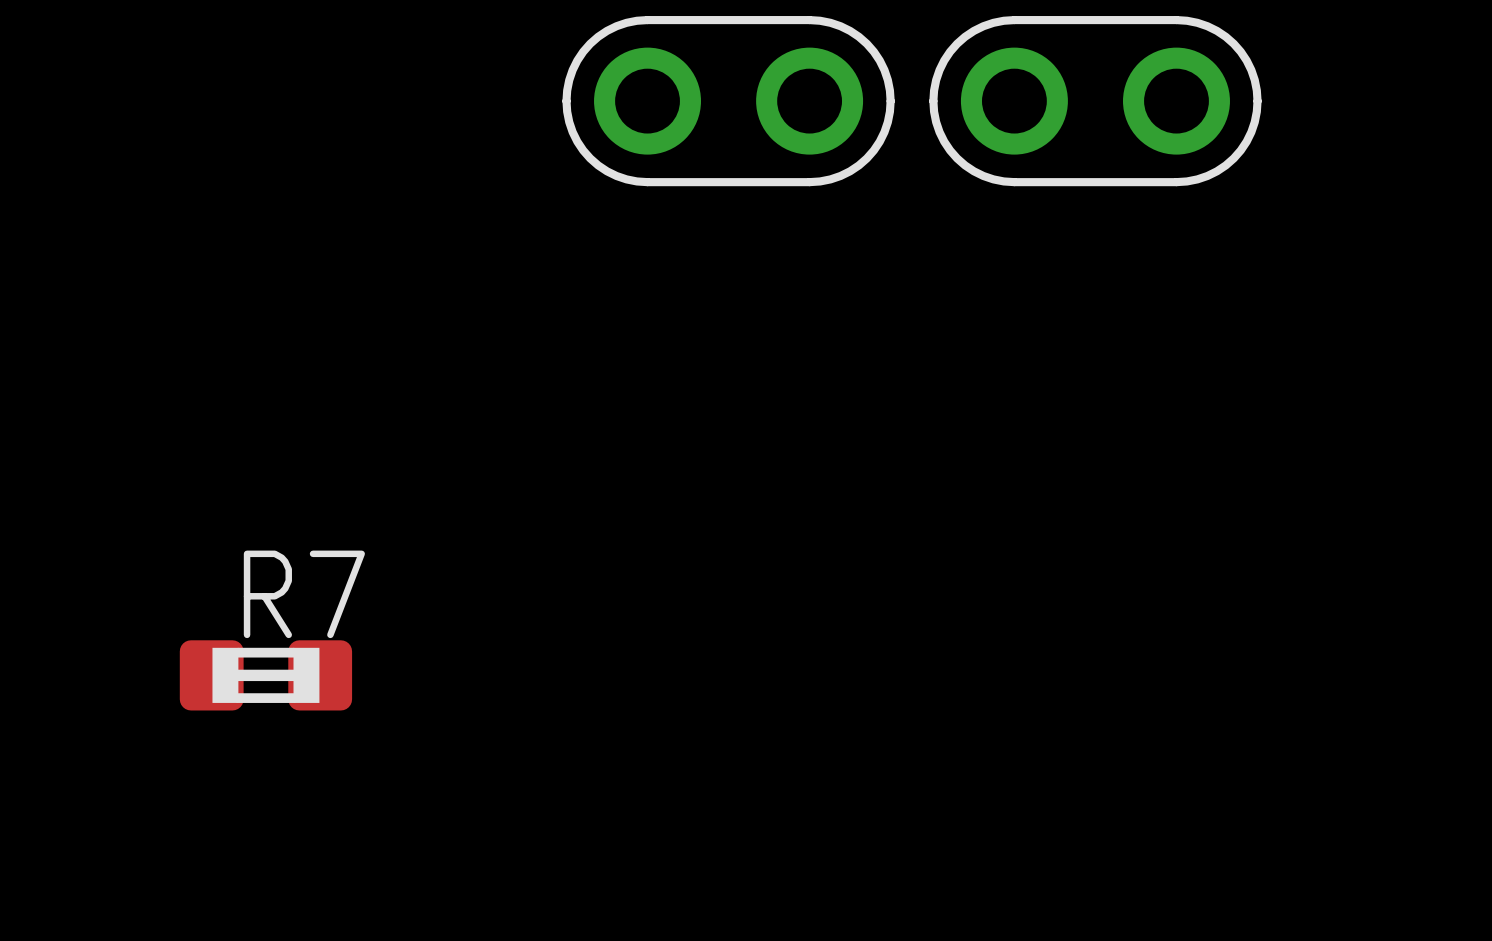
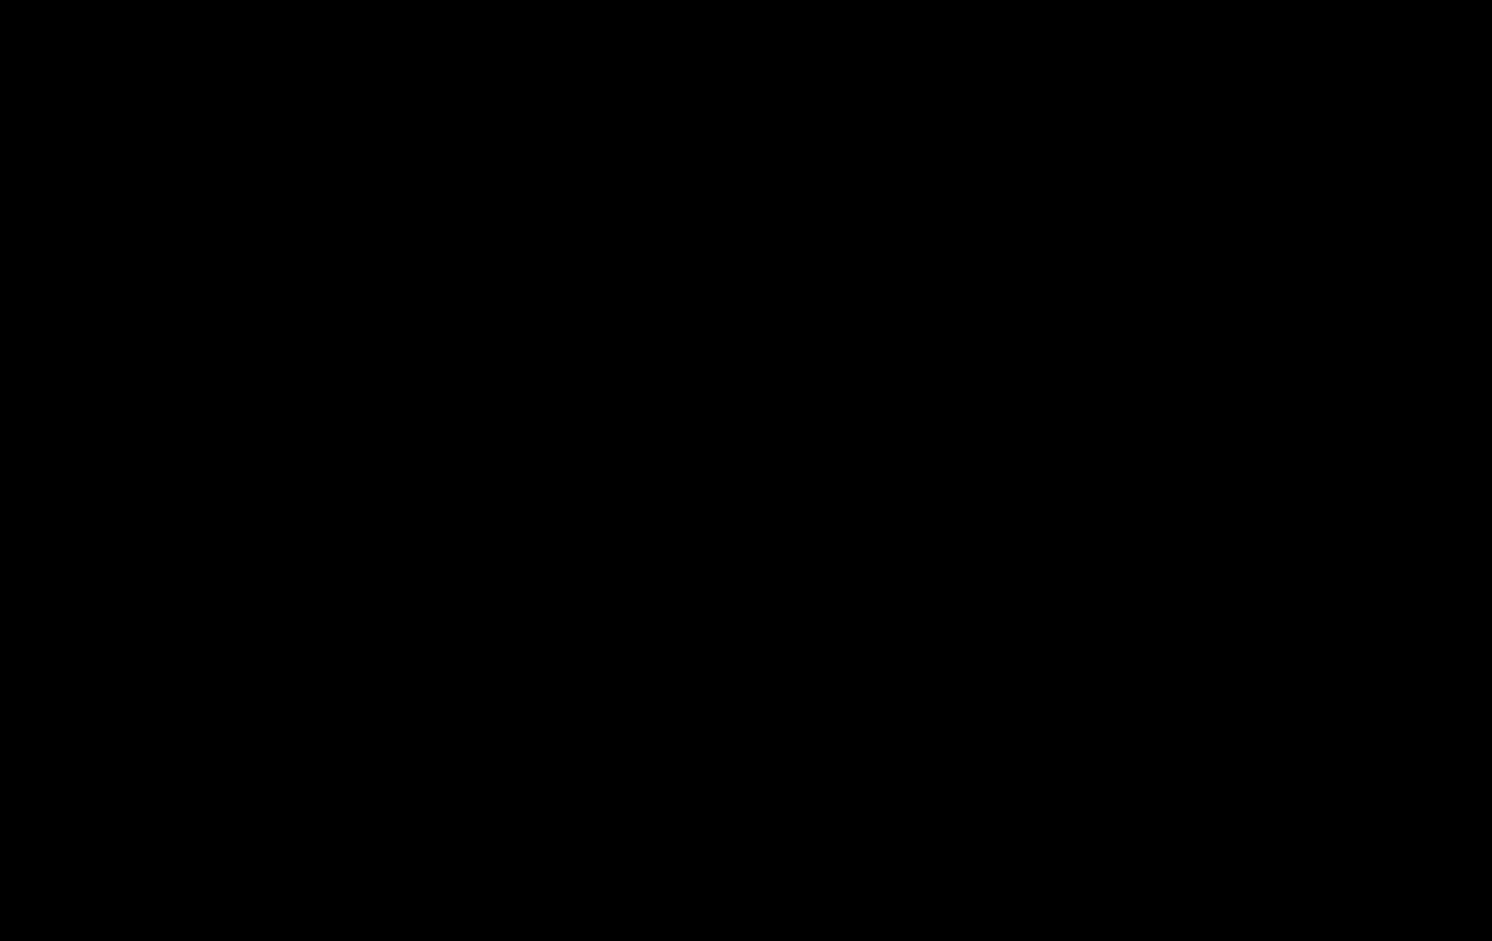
part: (728, 101) -> none
part: (1095, 101) -> none
R7: (265, 675) -> none

